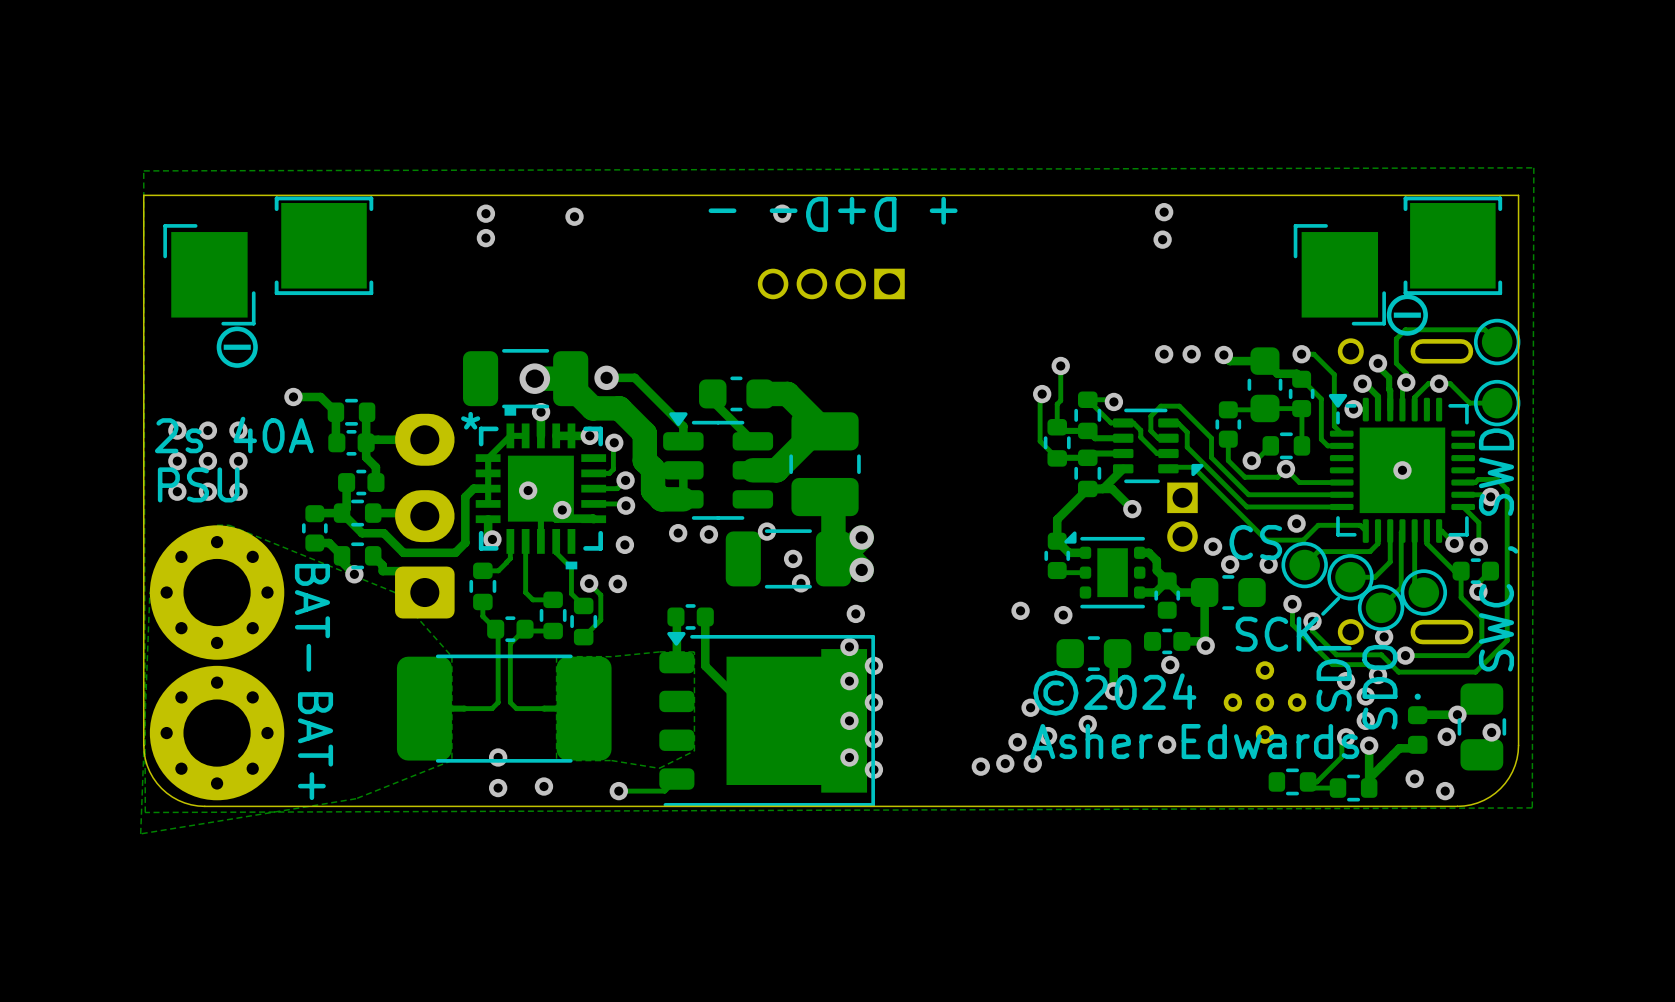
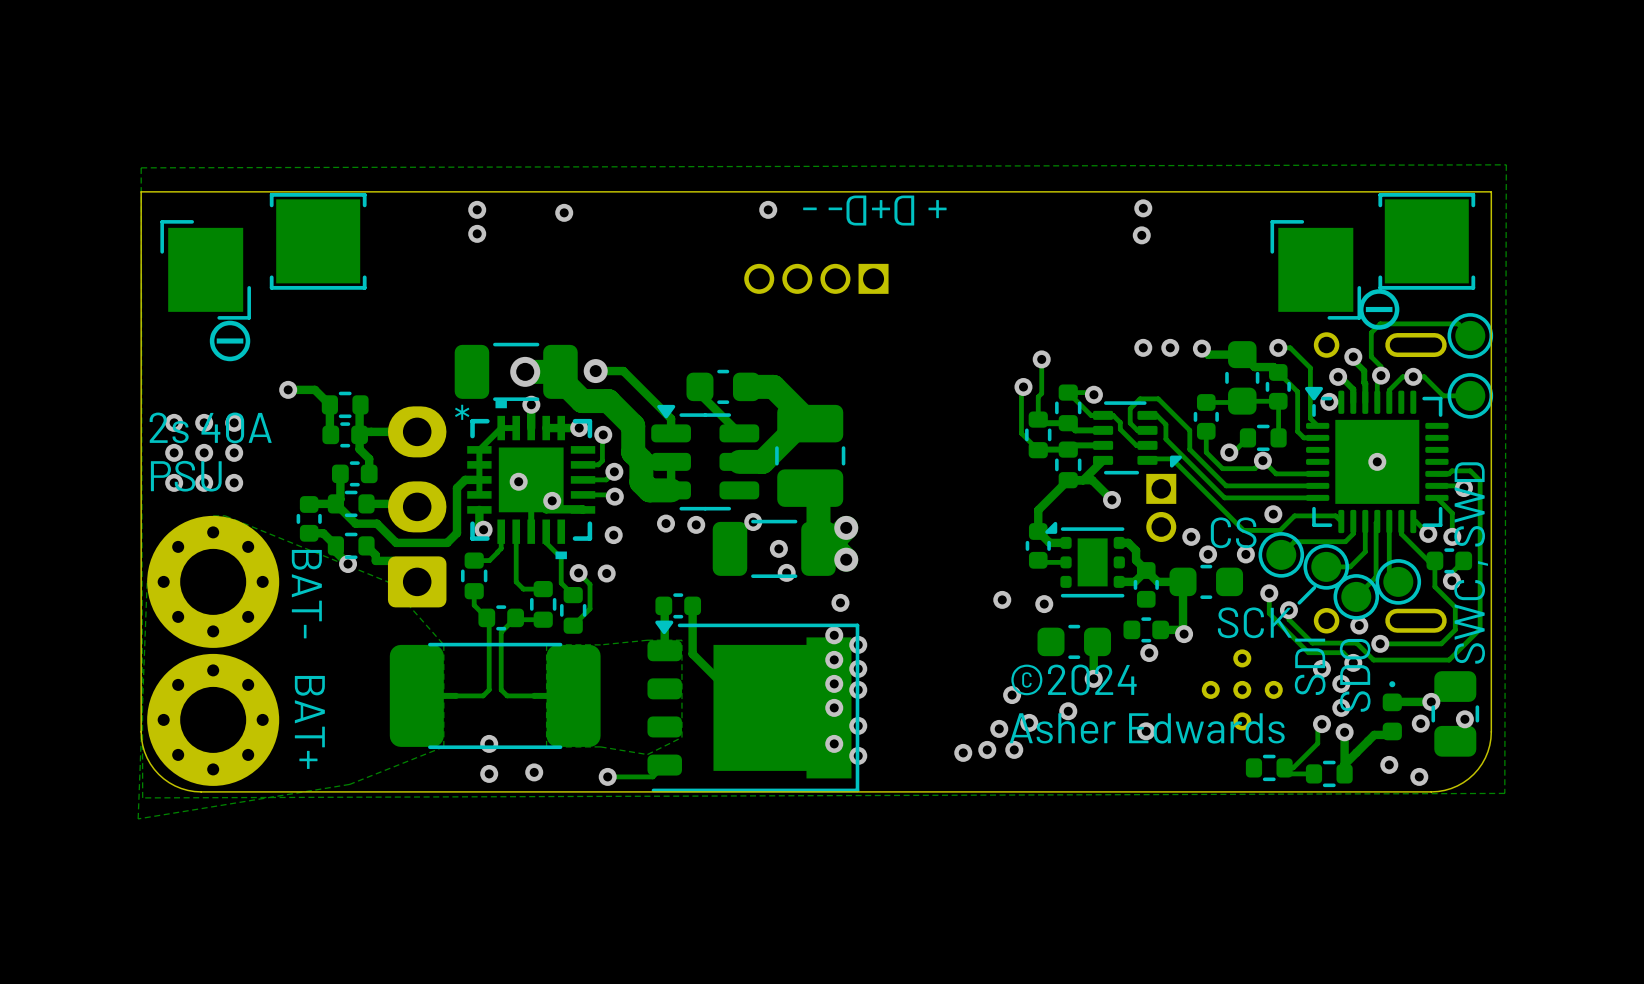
via: none -> (858, 644)
via: (873, 665) -> none
via: none -> (834, 659)
via: (849, 681) -> none
via: none -> (858, 668)
via: none -> (834, 683)

